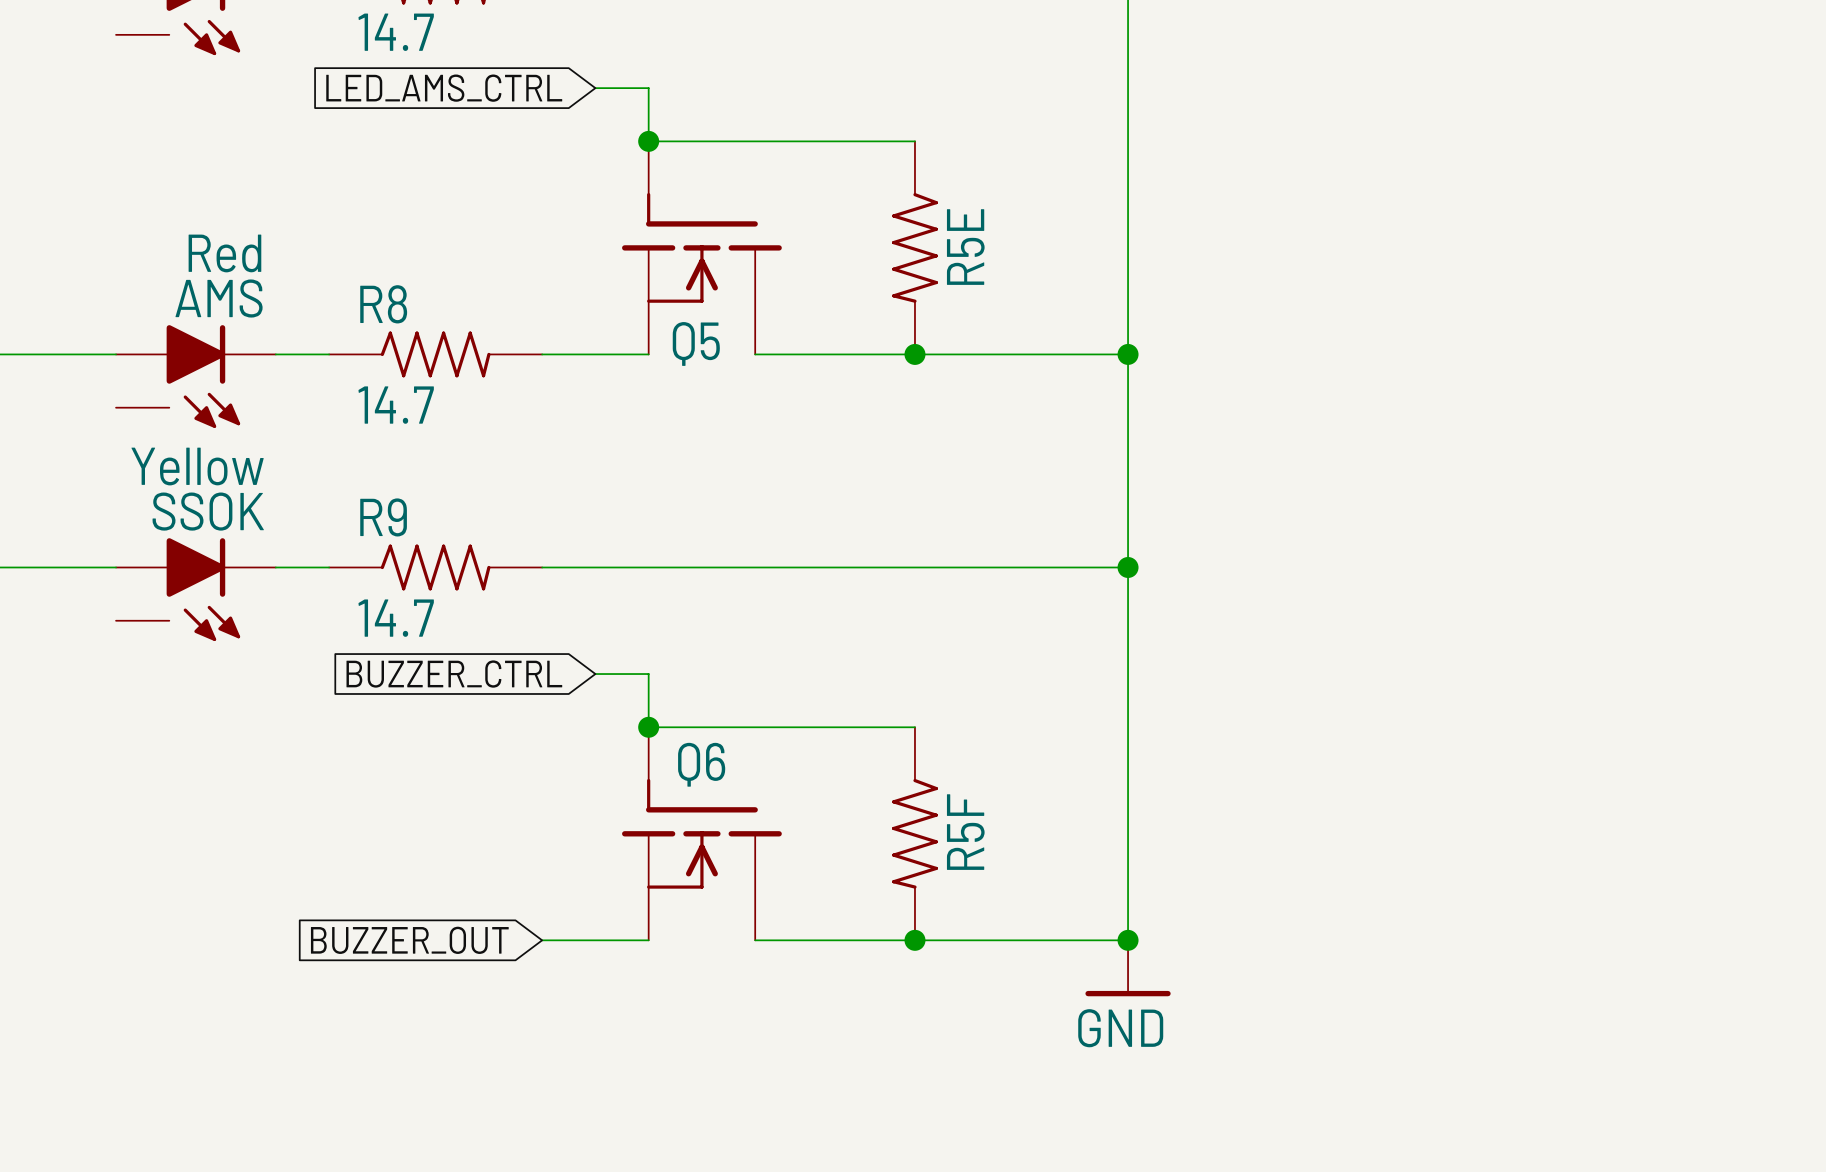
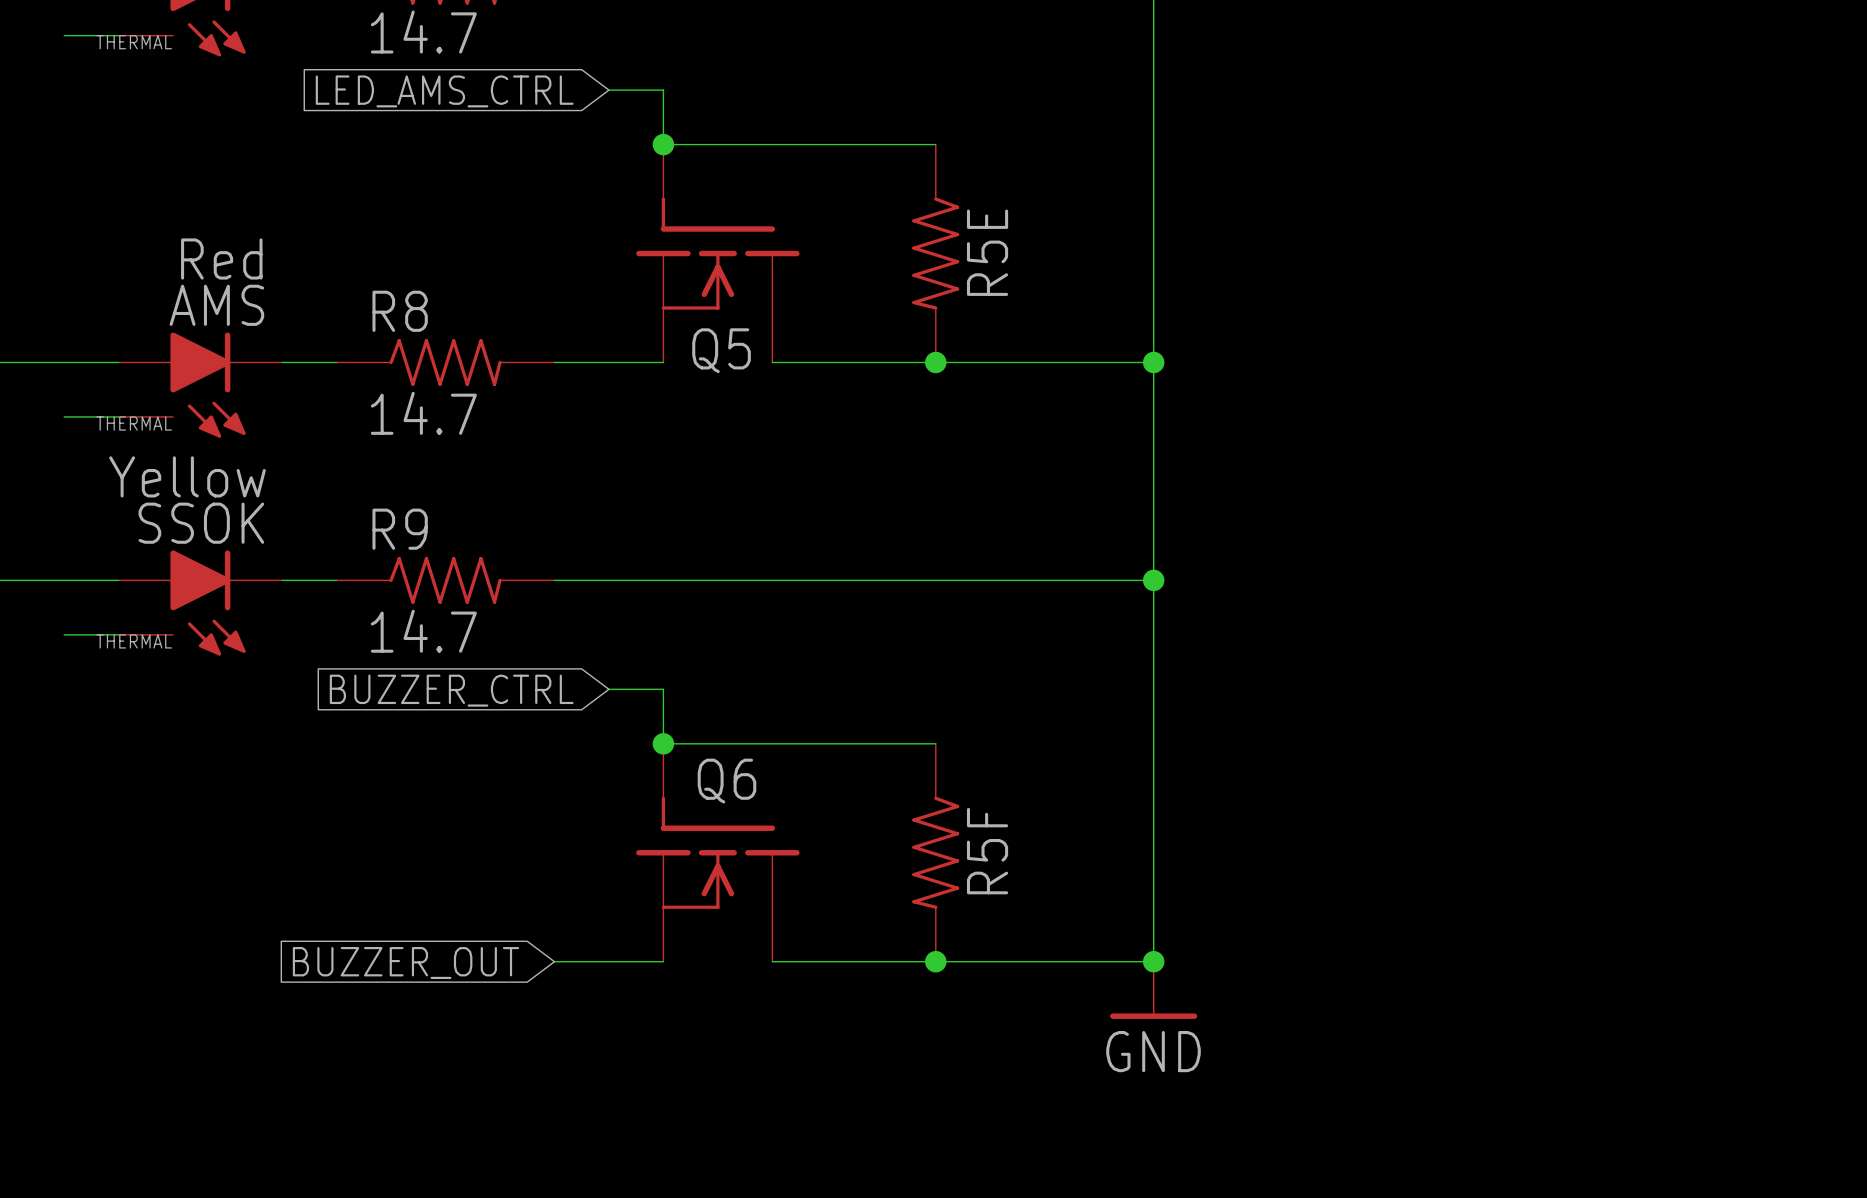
wire: none -> (64, 35) (118, 35)
label: none -> THERMAL (134, 42)
wire: none -> (64, 416) (118, 416)
label: none -> THERMAL (134, 423)
wire: none -> (64, 634) (118, 634)
label: none -> THERMAL (134, 641)

